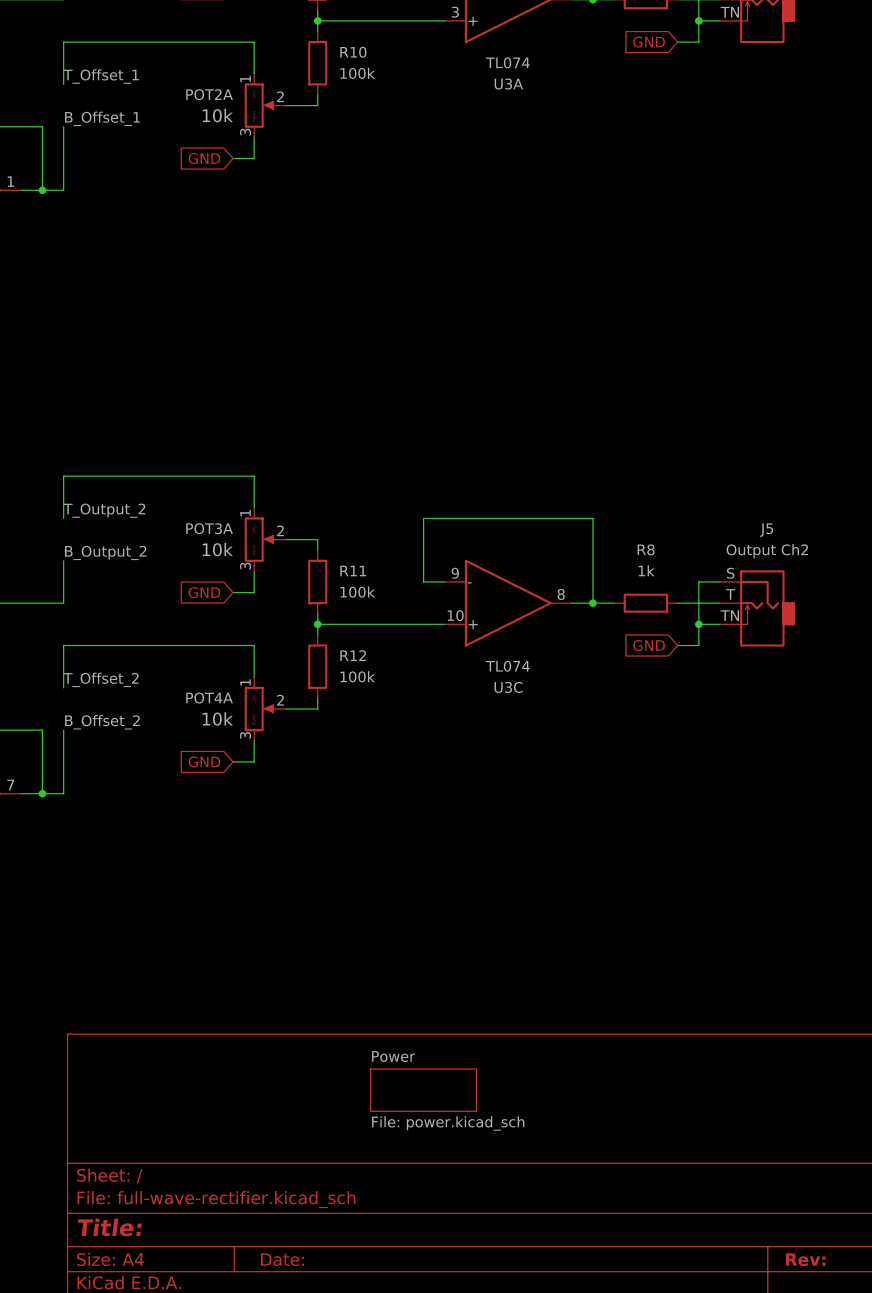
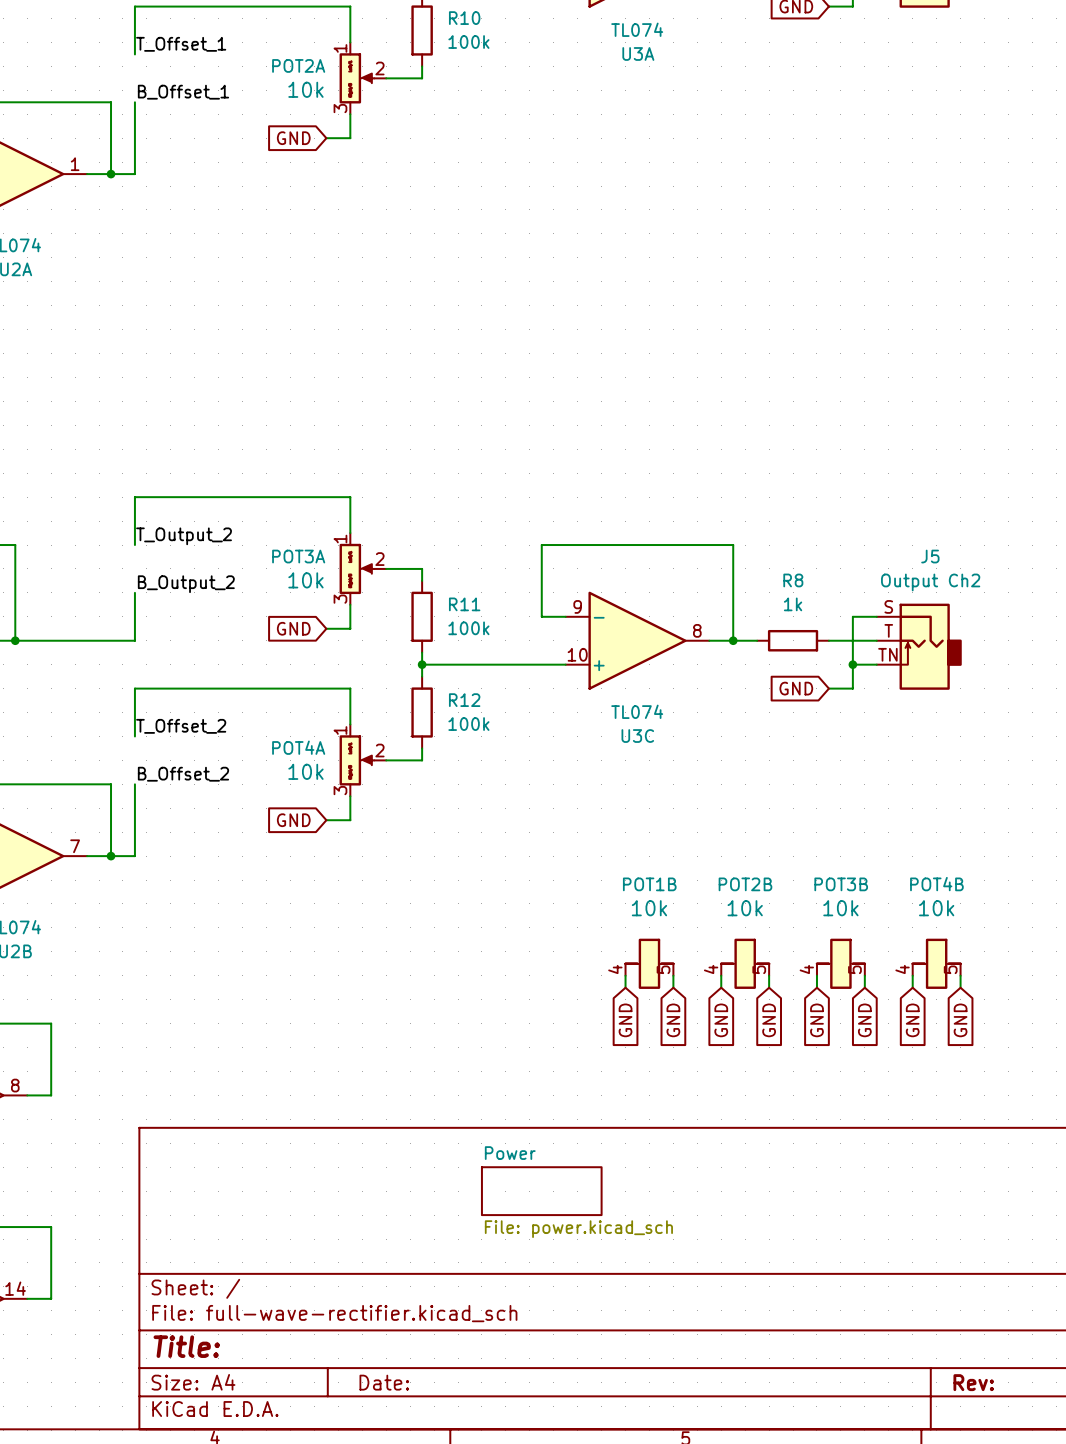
POT1B: none -> (649, 963)
POT2B: none -> (745, 963)
POT3B: none -> (840, 963)
POT4B: none -> (936, 963)
wire: none -> (625, 975) (625, 987)
wire: none -> (673, 975) (673, 987)
wire: none -> (721, 975) (721, 987)
wire: none -> (769, 975) (769, 987)
wire: none -> (816, 975) (816, 987)
wire: none -> (864, 975) (864, 987)
wire: none -> (912, 975) (912, 987)
wire: none -> (960, 975) (960, 987)
global label: none -> GND (625, 1020)
global label: none -> GND (673, 1020)
global label: none -> GND (721, 1020)
global label: none -> GND (769, 1020)
global label: none -> GND (816, 1020)
global label: none -> GND (864, 1020)
global label: none -> GND (912, 1020)
global label: none -> GND (960, 1020)

